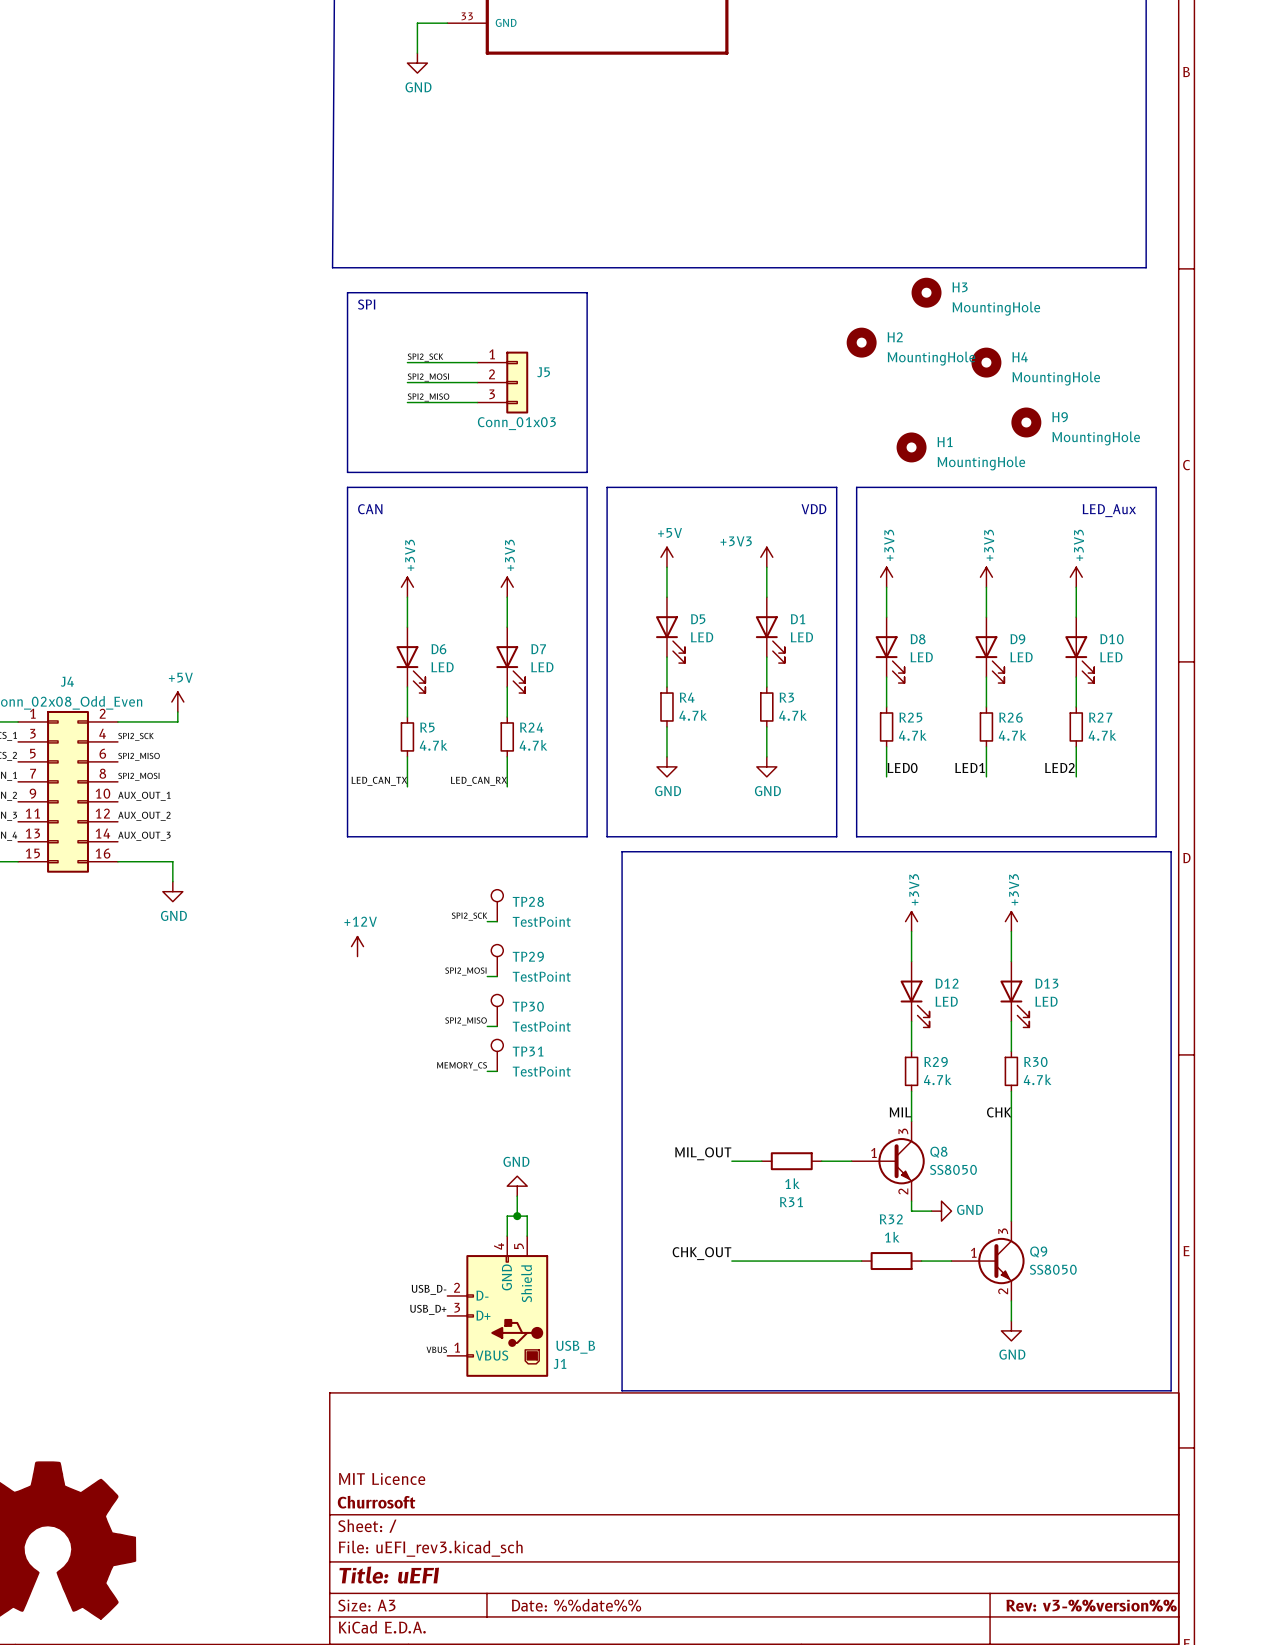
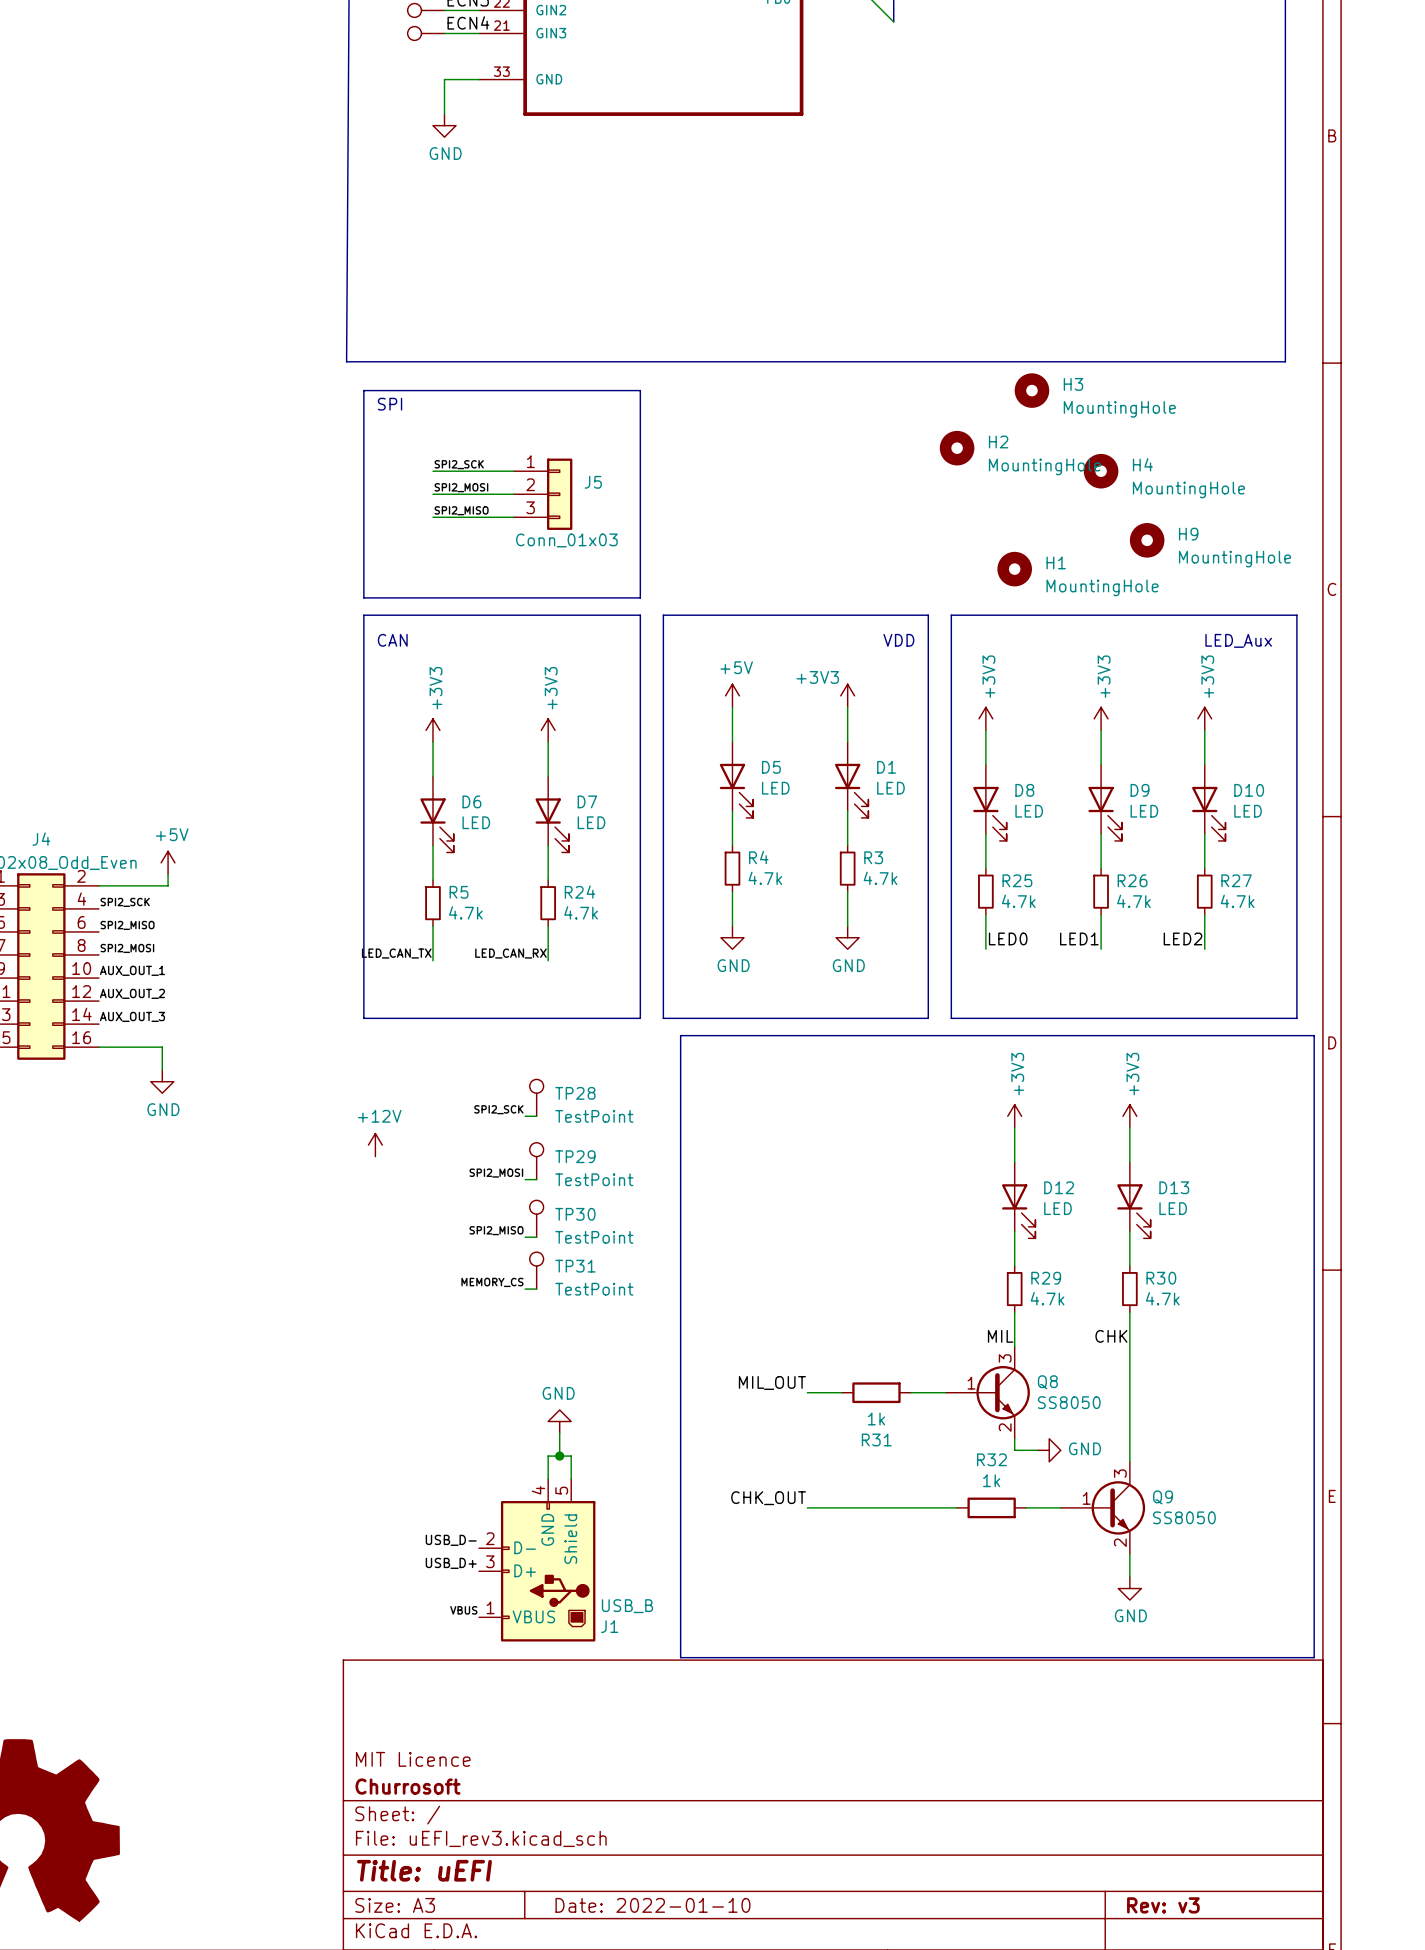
title block: Date: %%date%% (576, 1605) -> Date: 2022-01-10 (652, 1905)
title block: Rev: v3-%%version%% (1091, 1605) -> Rev: v3 (1163, 1905)

